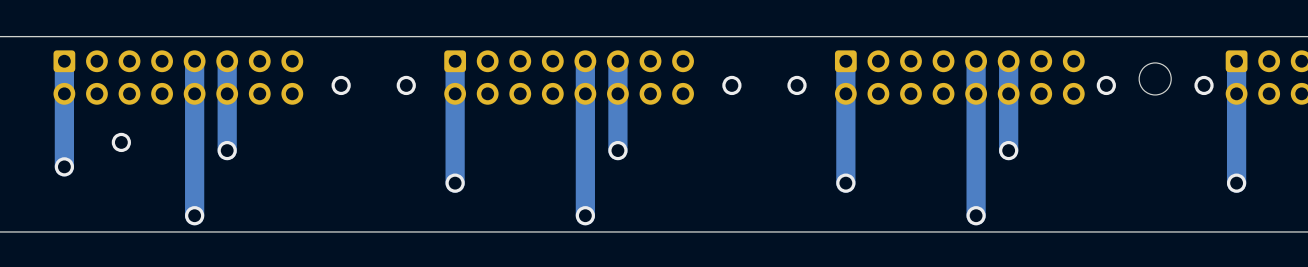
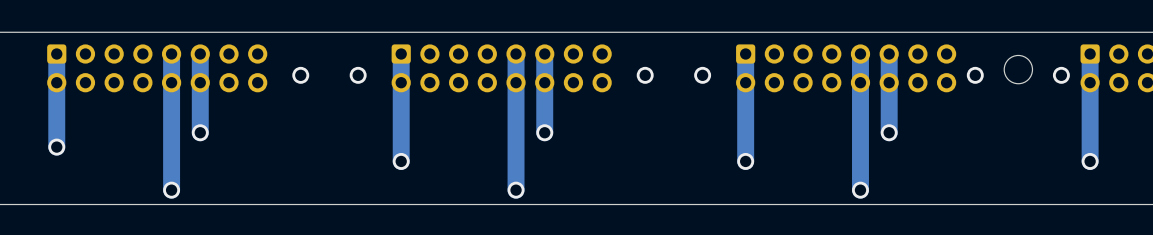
via: (121, 142) -> none

